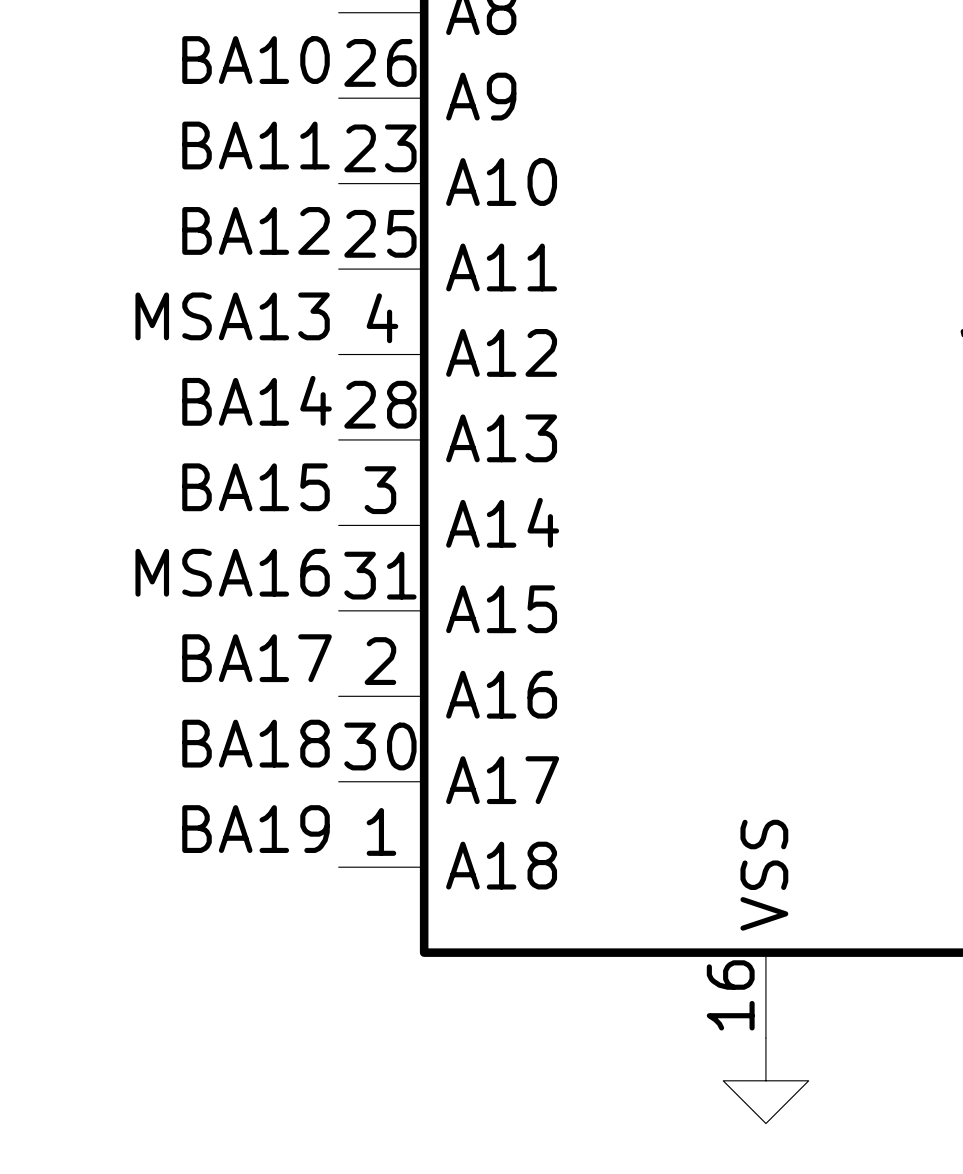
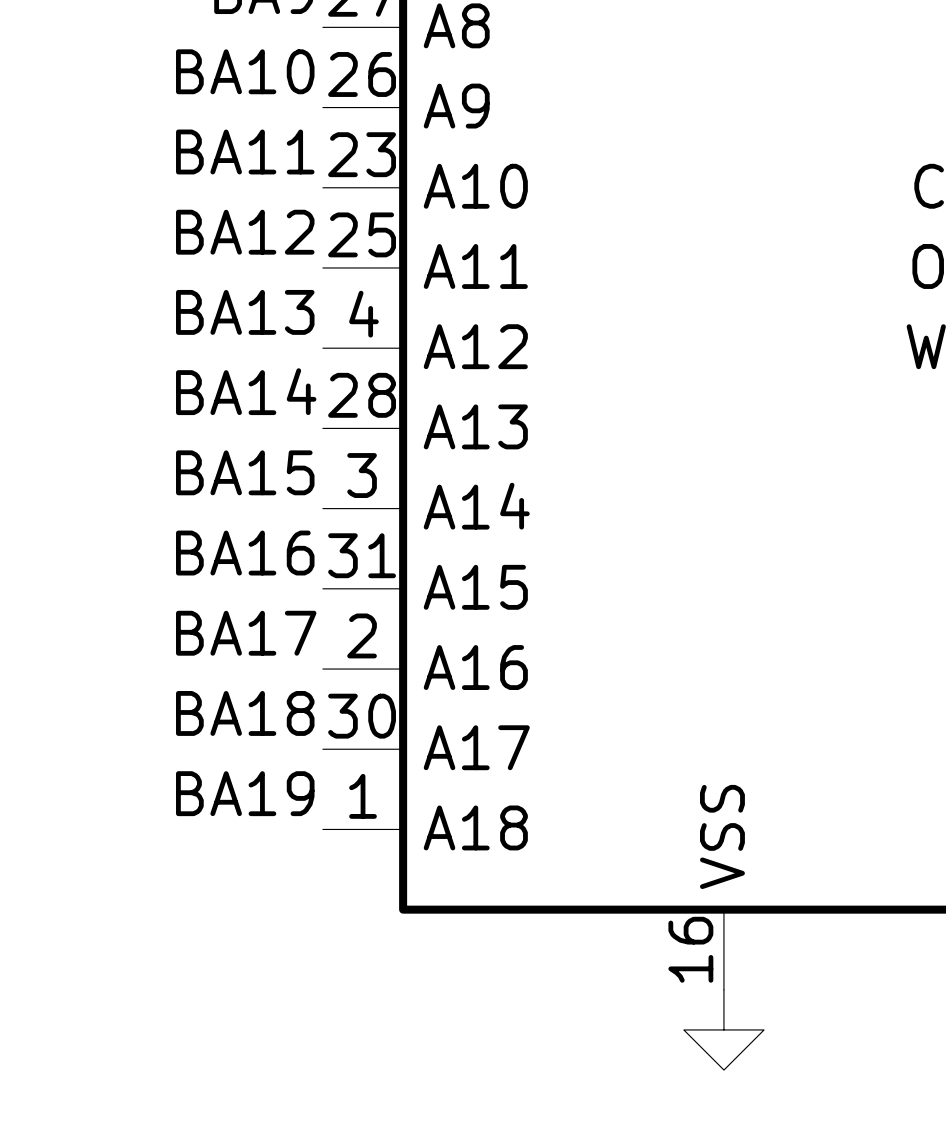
label: MSA13 (232, 316) -> BA13 (245, 312)
label: MSA16 (232, 572) -> BA16 (245, 553)

